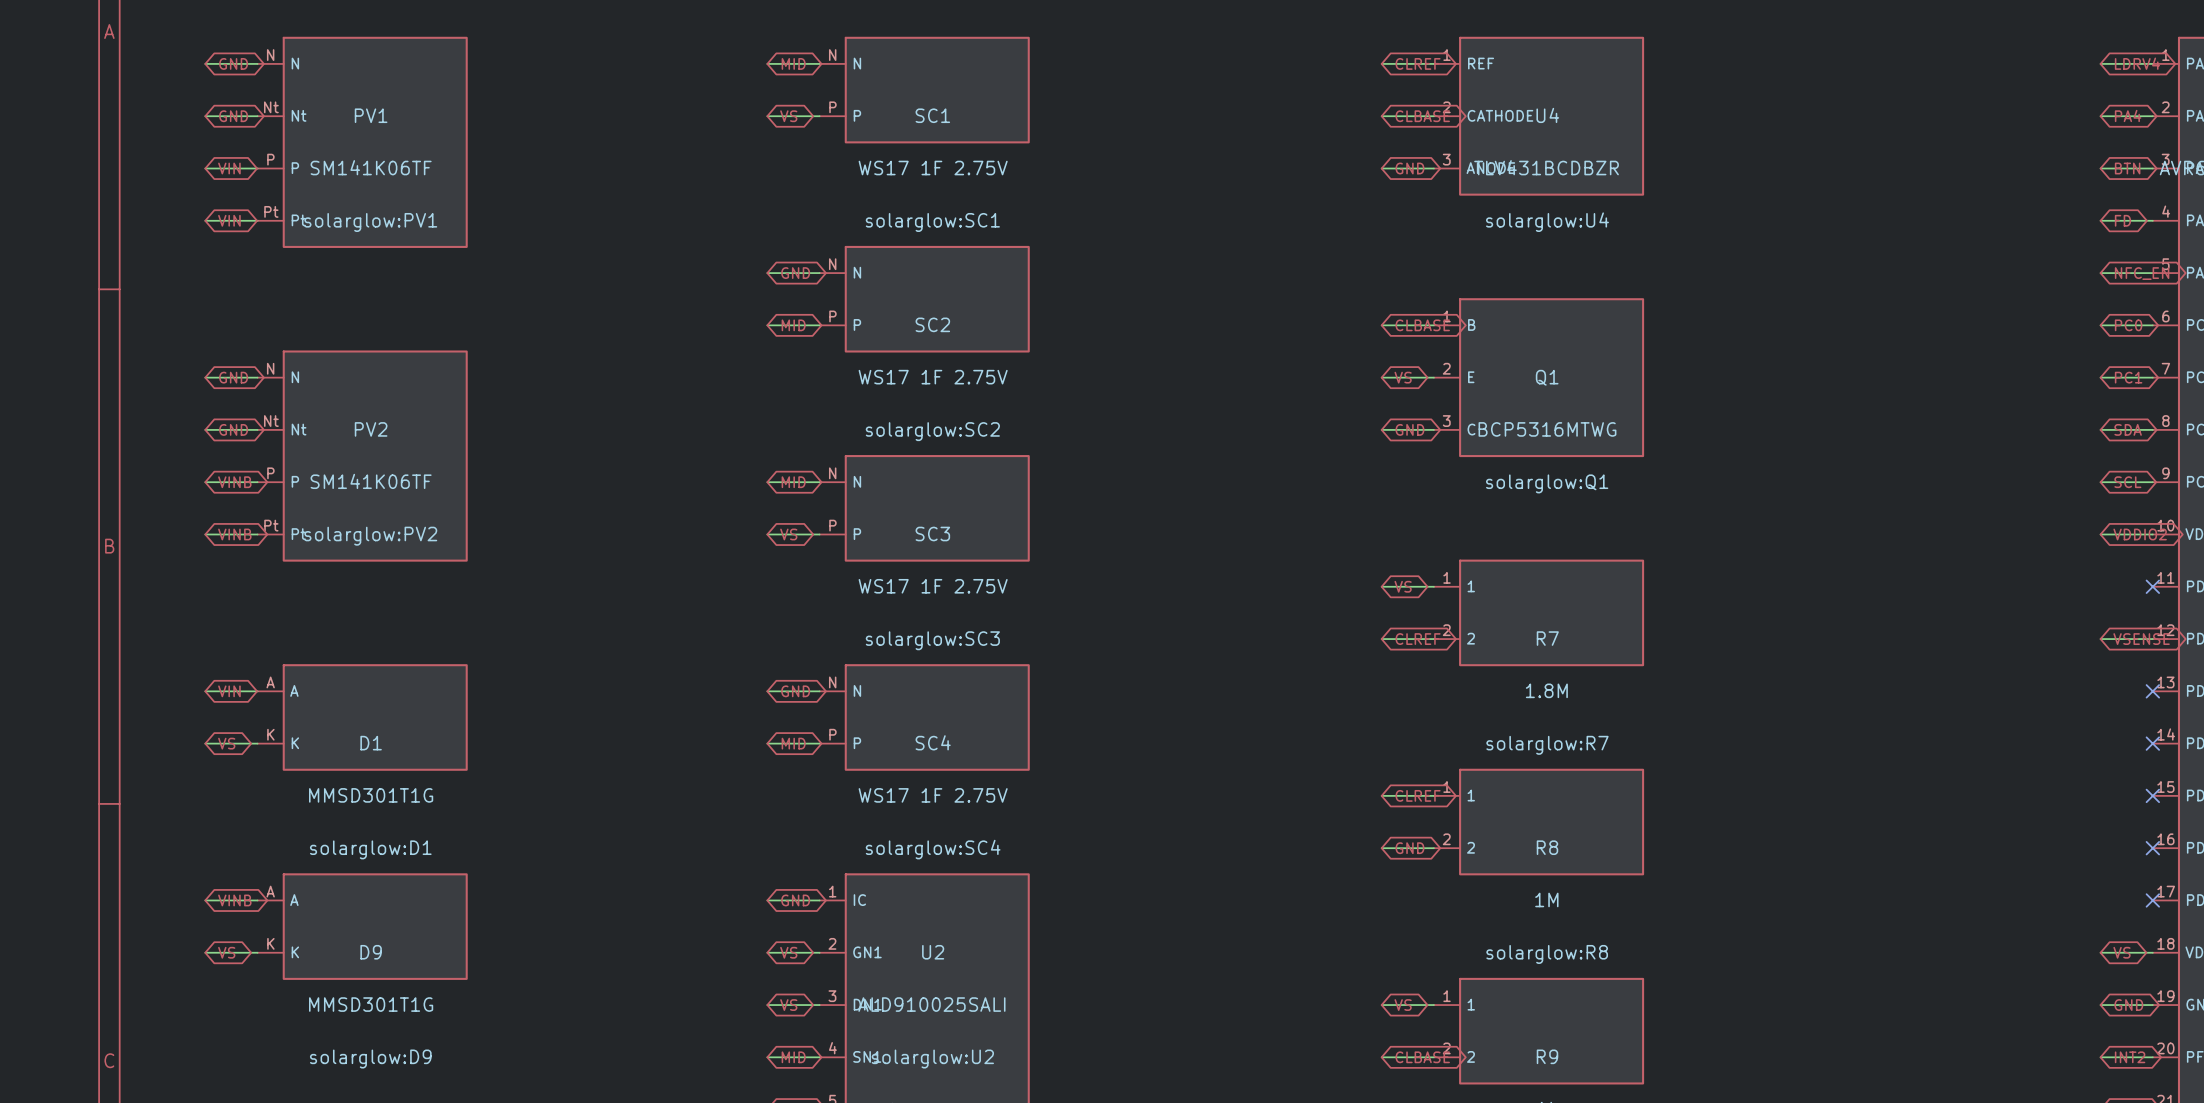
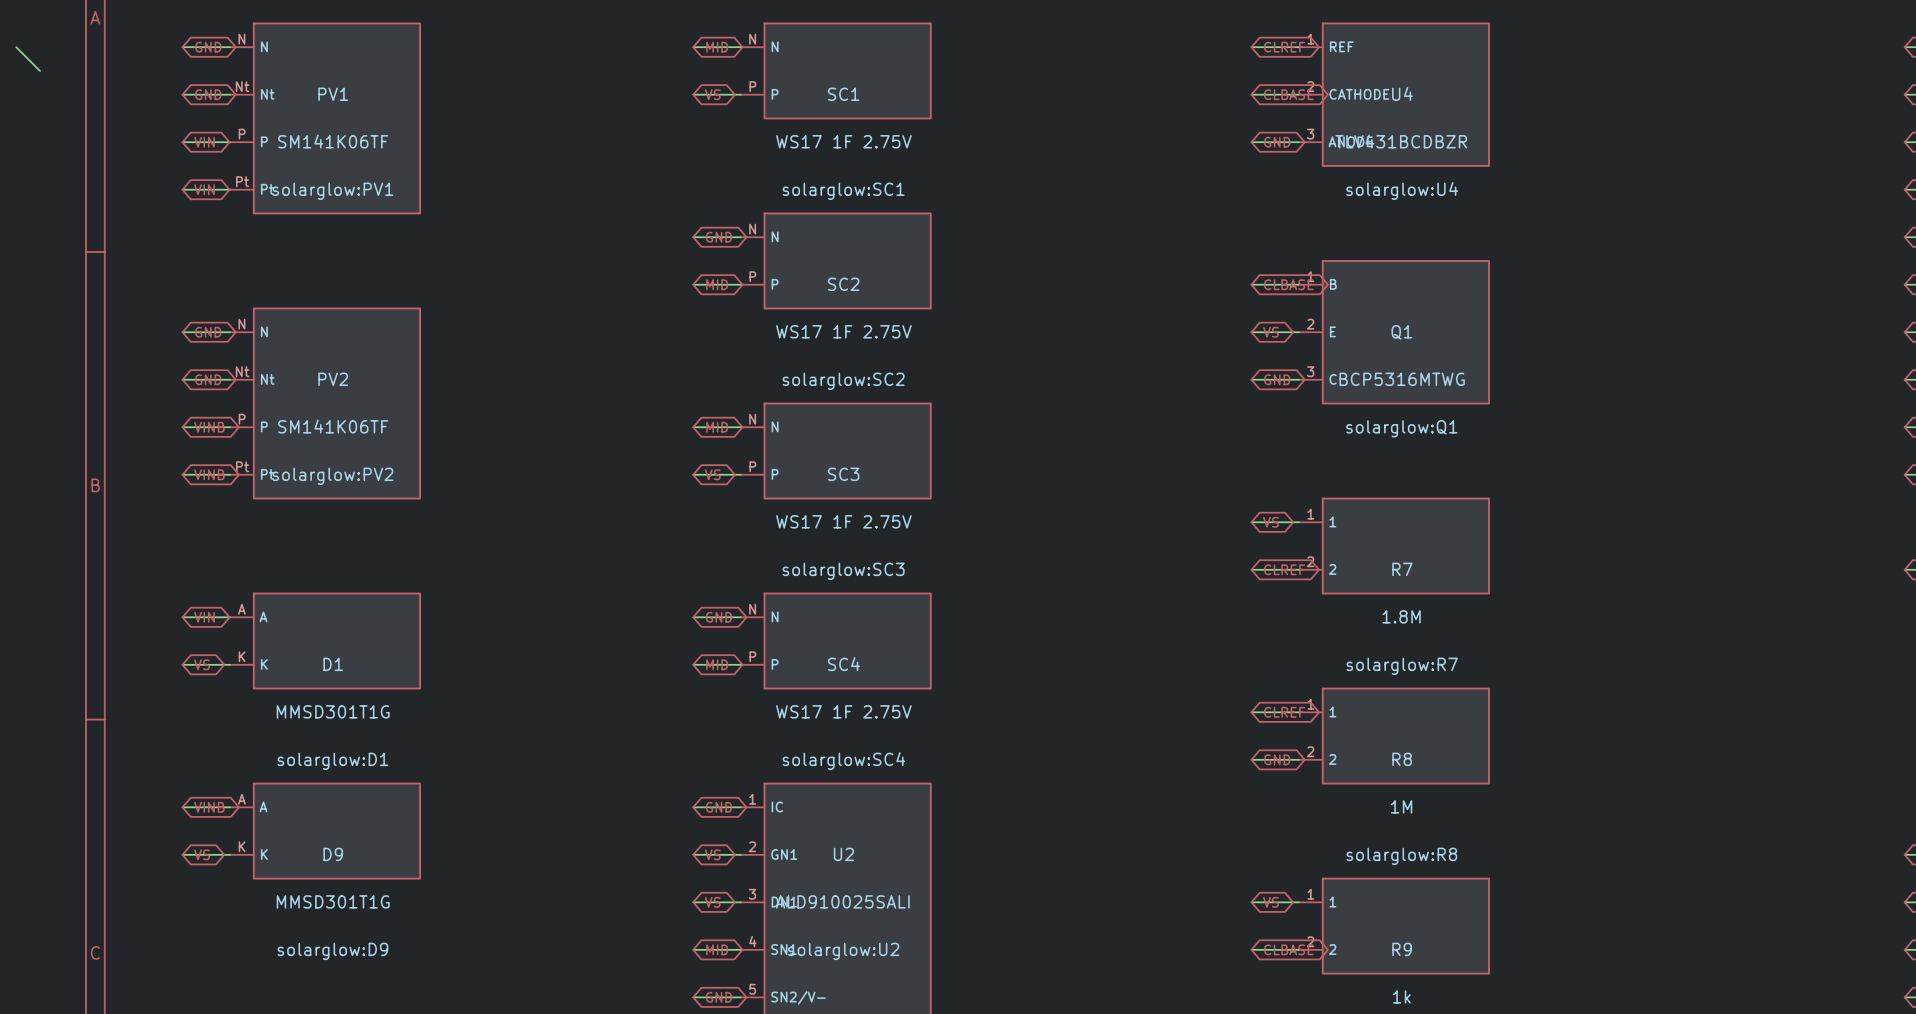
wire: none -> (16, 47) (40, 70)

